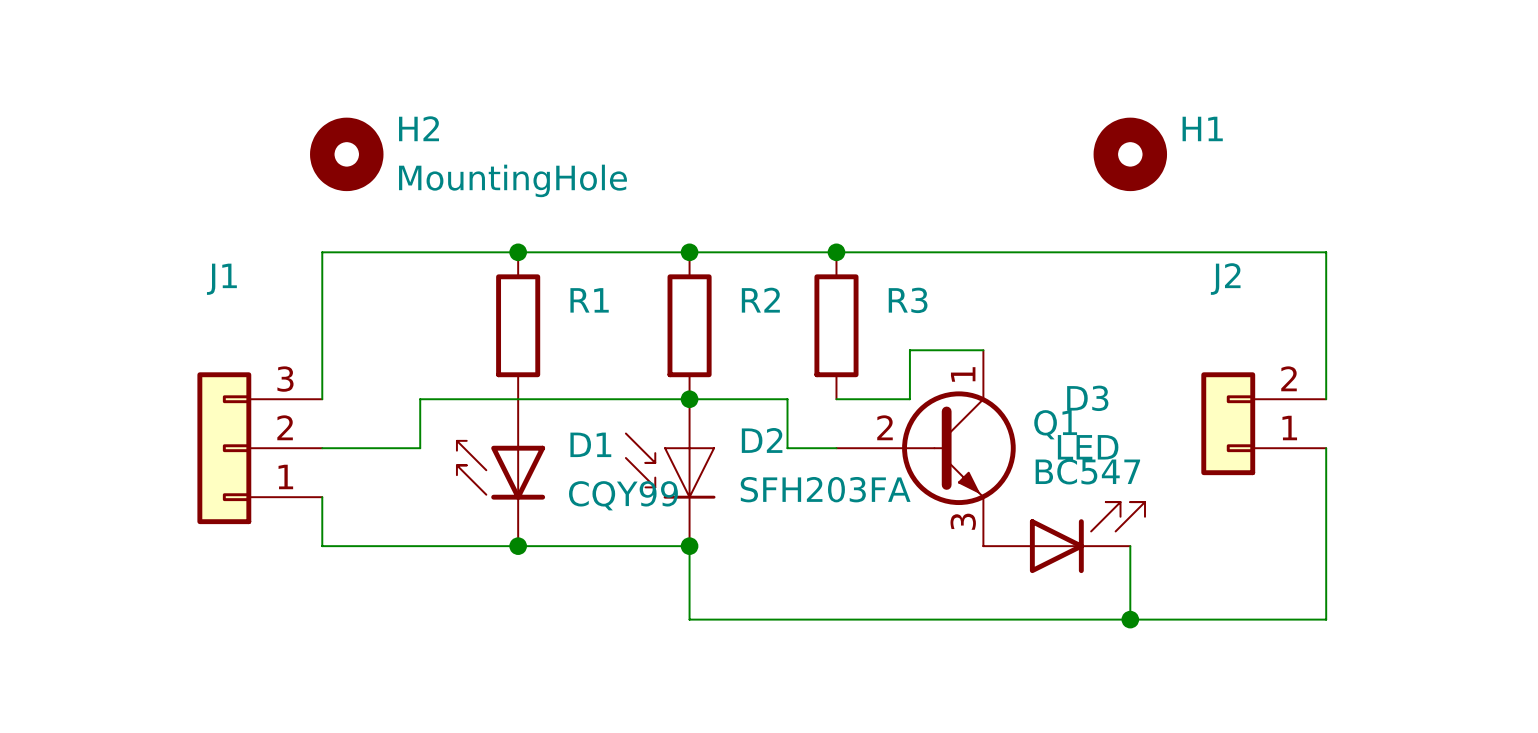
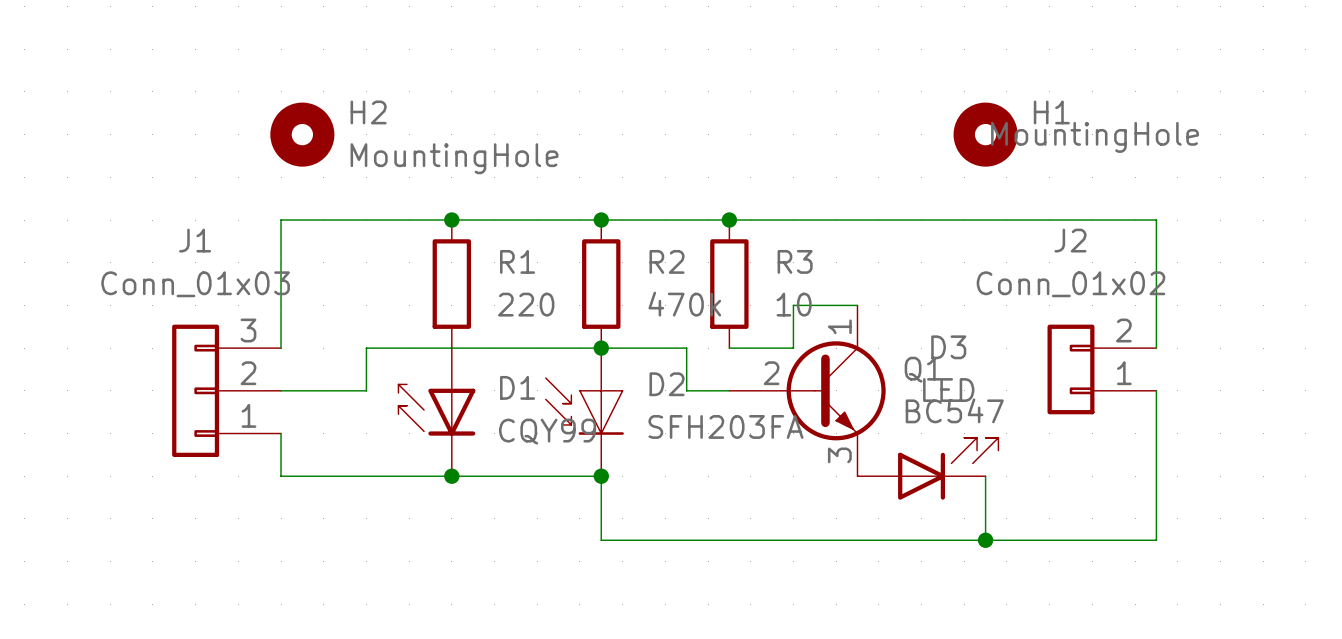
H1 value: none -> MountingHole (1095, 137)
J1 value: none -> Conn_01x03 (195, 284)
J2 value: none -> Conn_01x02 (1070, 284)
R1 value: none -> 220 (526, 304)
R2 value: none -> 470k (684, 304)
R3 value: none -> 10 (794, 304)

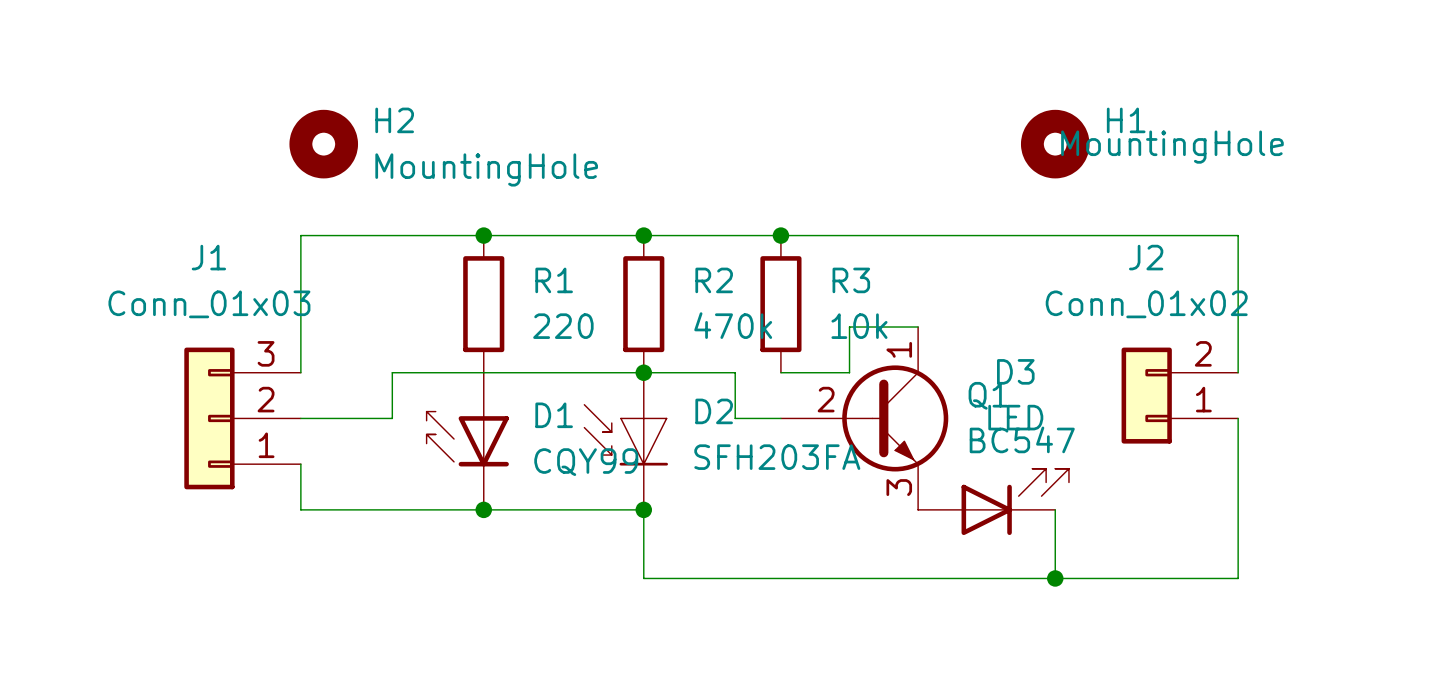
R3 value: 10 (794, 304) -> 10k (859, 326)

